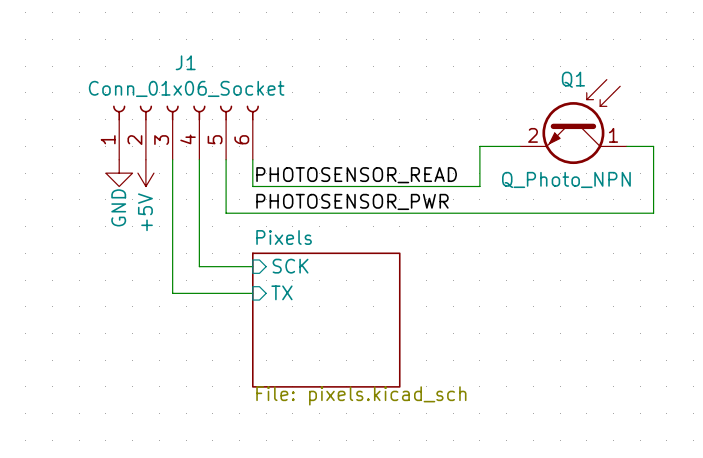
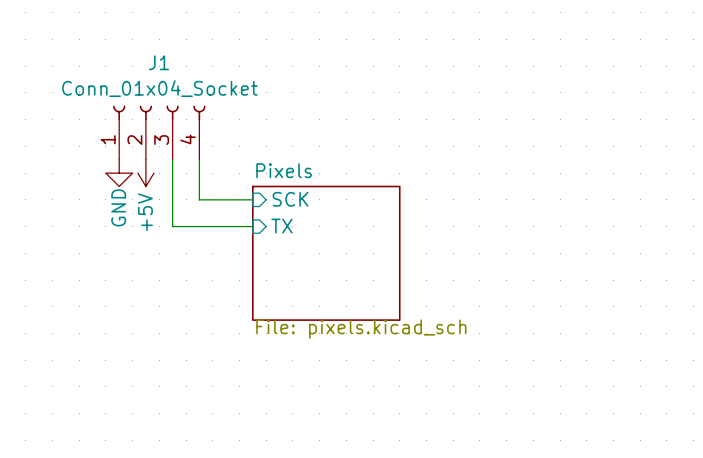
J1 value: Conn_01x06_Socket (186, 88) -> Conn_01x04_Socket (159, 88)
J1 symbol: [113, 105, 259, 160] -> [113, 105, 206, 160]
Q1: Q_Photo_NPN (573, 121) -> none
wire: (519, 146) (479, 146) (479, 186) (252, 186) (252, 159) -> none
wire: (626, 146) (653, 146) (653, 213) (226, 213) (226, 159) -> none
label: PHOTOSENSOR_READ (356, 175) -> none
wire: (199, 199) (199, 266) (252, 266) -> (199, 199) (252, 199)
label: PHOTOSENSOR_PWR (352, 201) -> none
wire: (172, 226) (172, 293) (252, 293) -> (172, 226) (252, 226)
sheet pin position: SCK (290, 266) -> SCK (290, 199)
sheet pin position: TX (281, 292) -> TX (281, 226)
sheet Pixels position: (326, 320) -> (326, 253)

